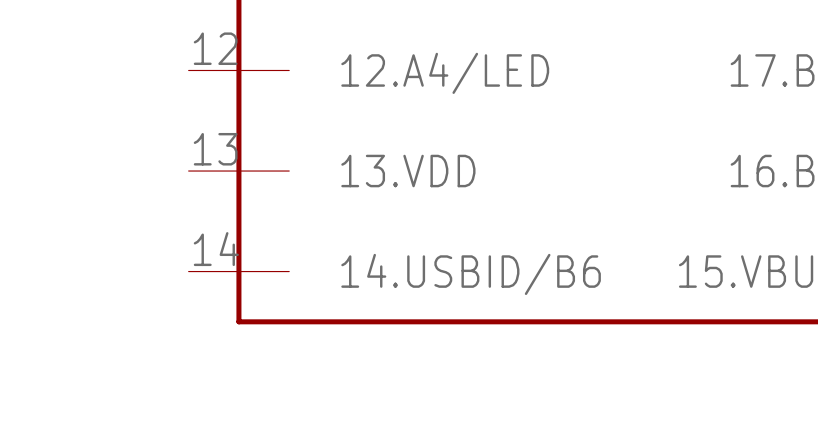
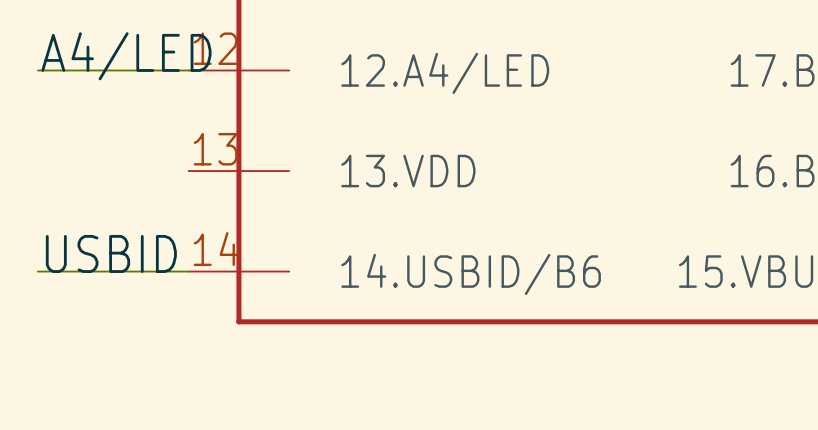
label: none -> A4/LED (126, 56)
wire: none -> (37, 70) (188, 70)
label: none -> USBID (111, 253)
wire: none -> (37, 271) (188, 271)

